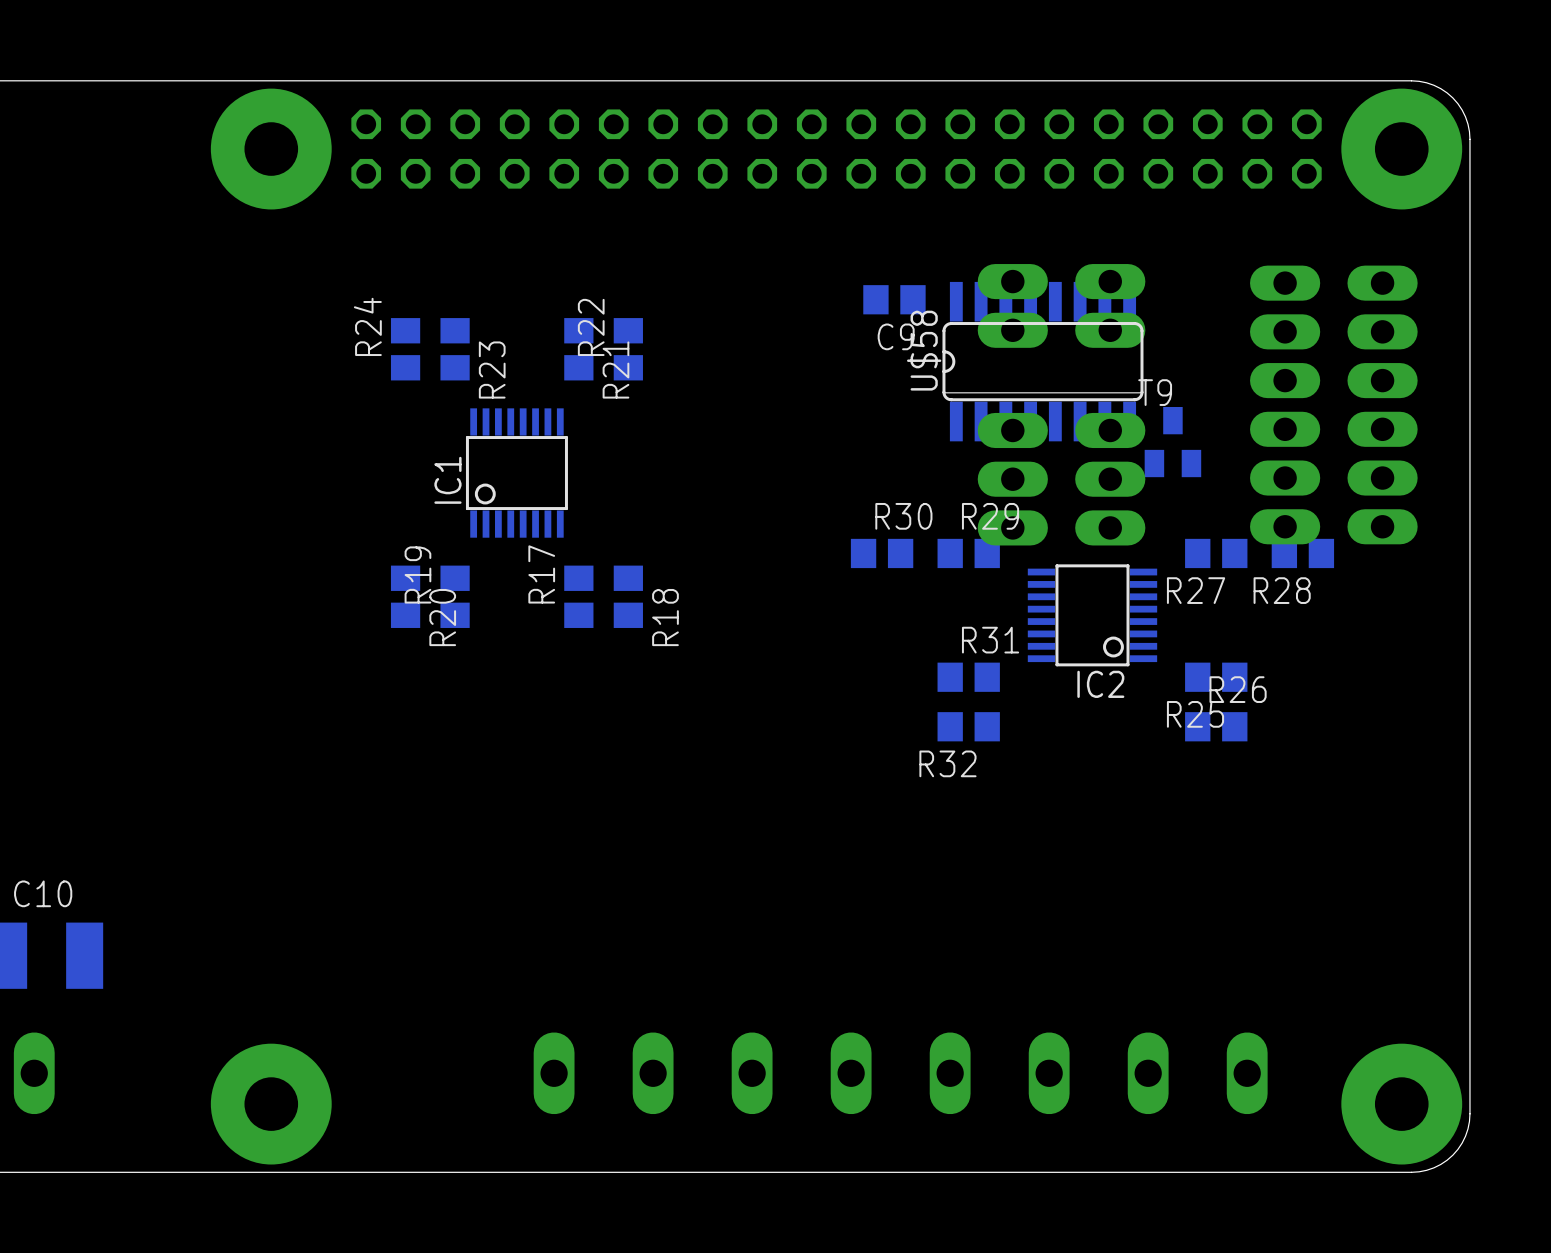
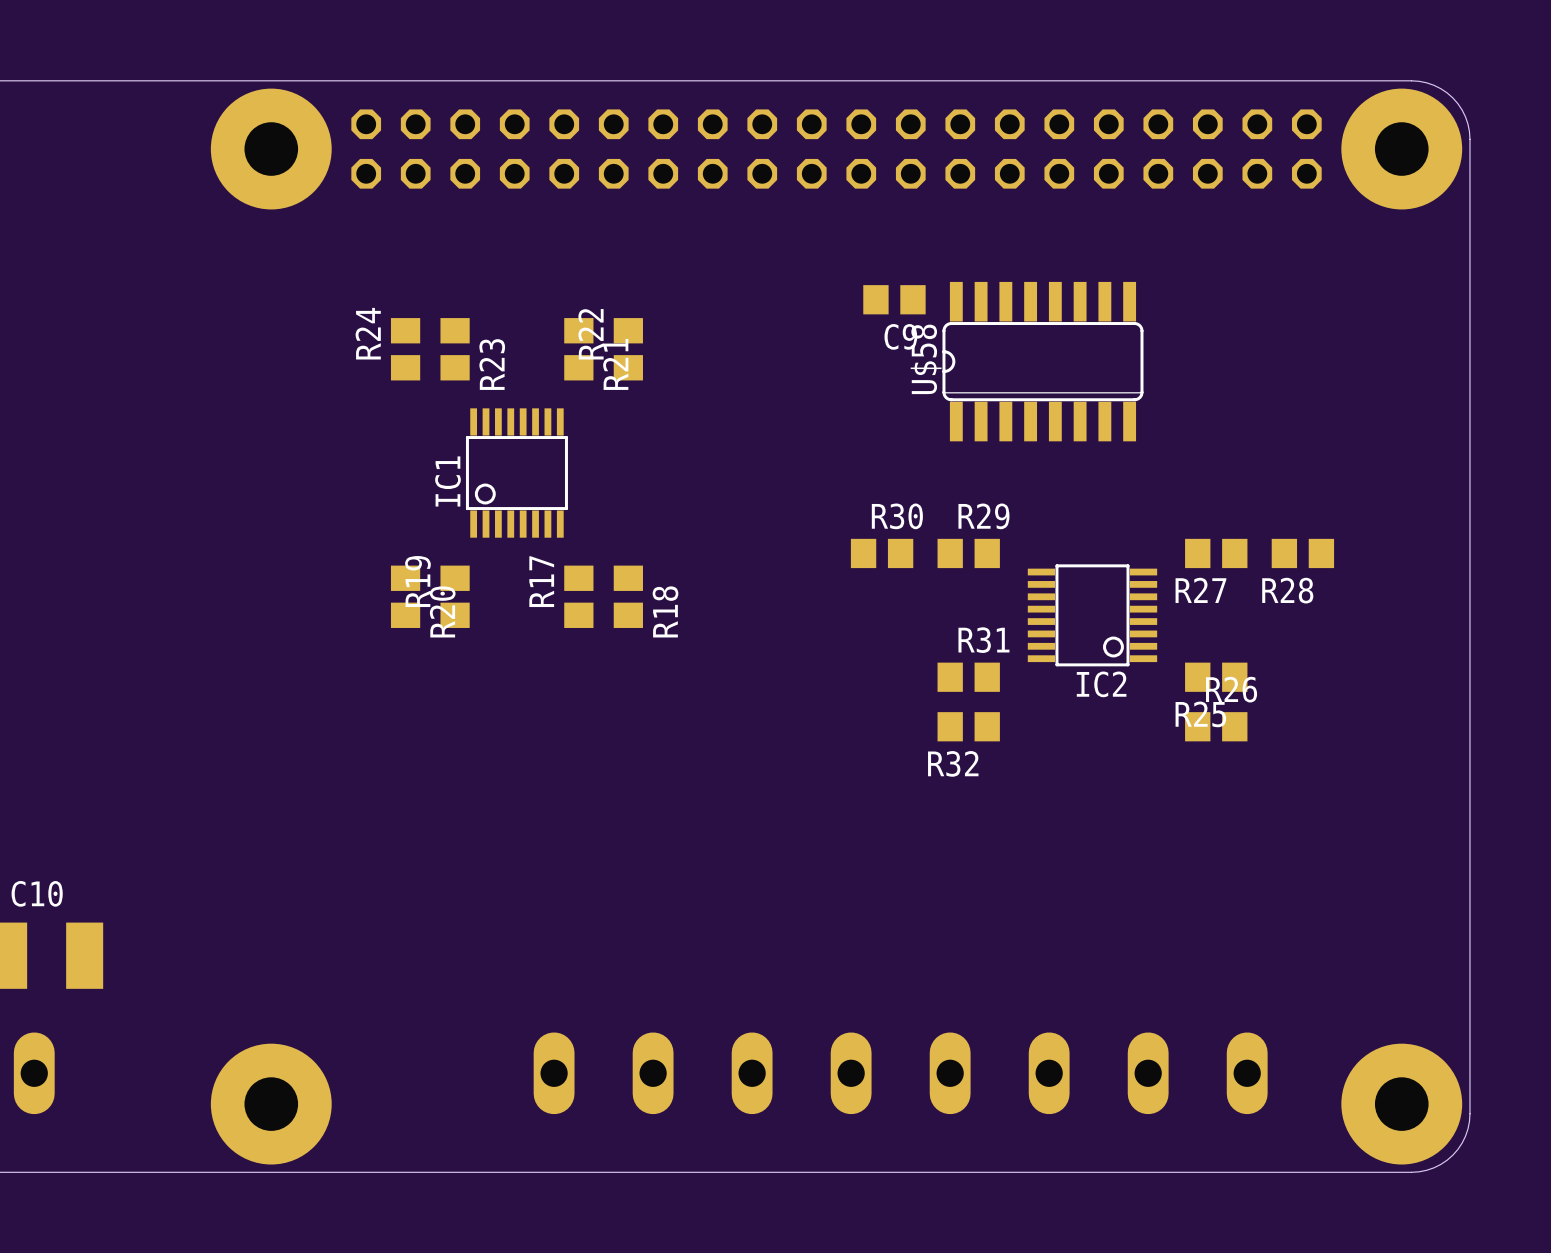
part: (1061, 305) -> none
part: (1333, 404) -> none
T9: (1172, 442) -> none
part: (1061, 479) -> none

